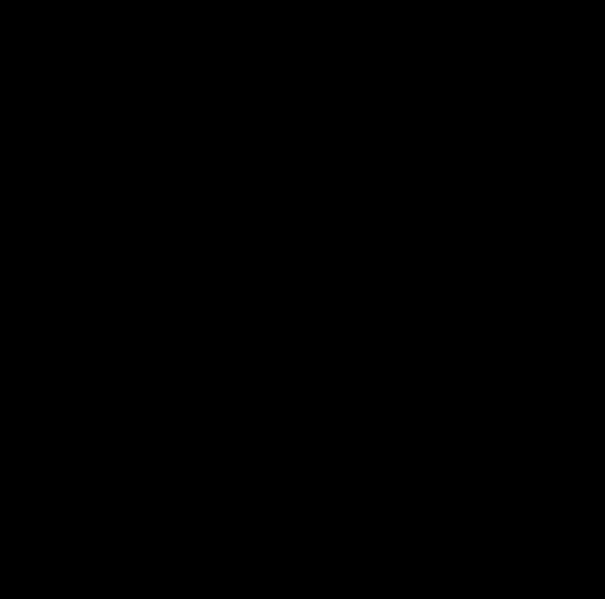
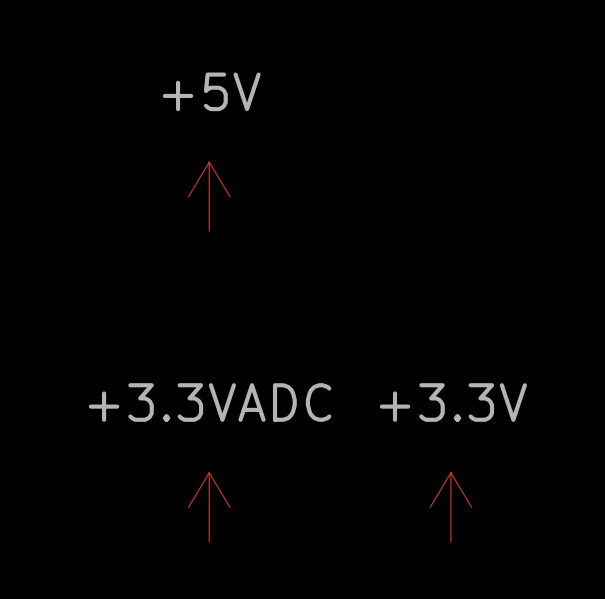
power symbol: none -> +5V (209, 196)
power symbol: none -> +3.3VADC (209, 507)
power symbol: none -> +3.3V (450, 507)

